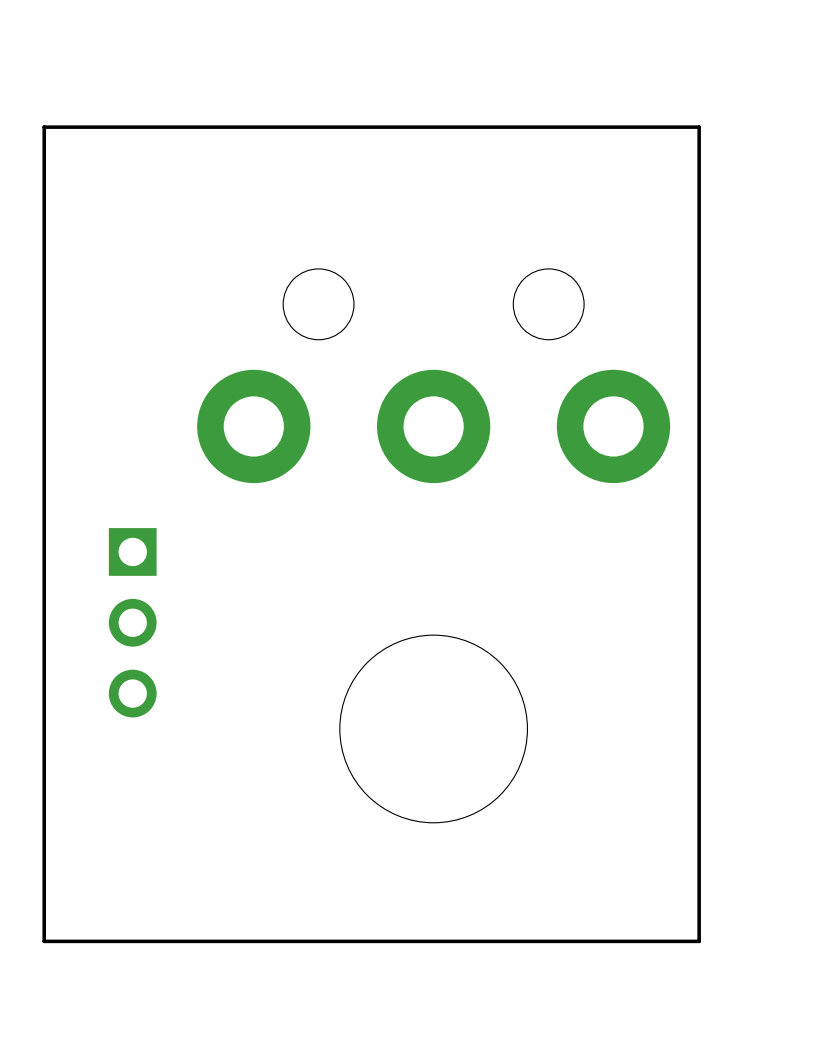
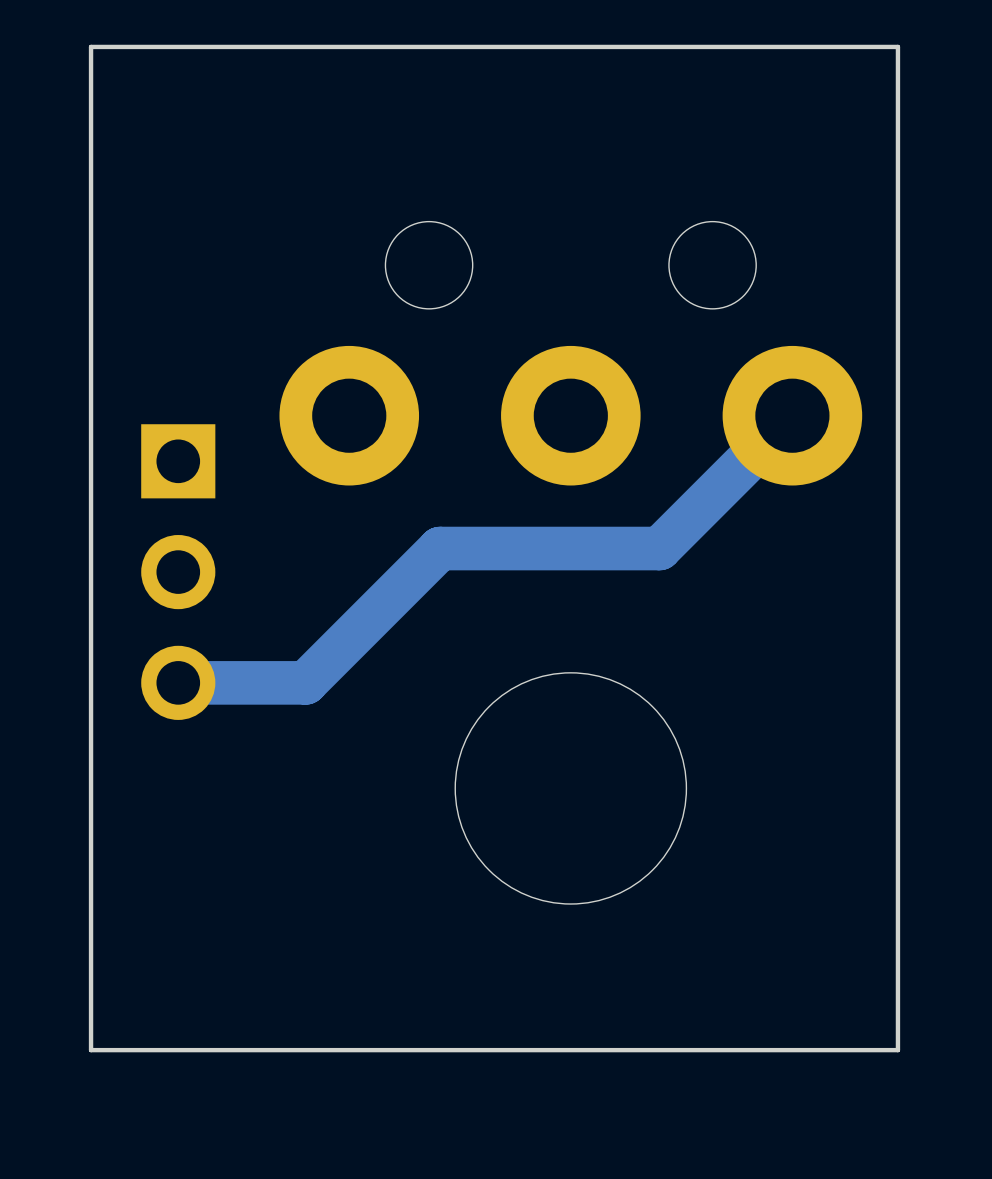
track: none -> (792, 415) (659, 548) (439, 548) (305, 682) (178, 682)
part: none -> (178, 572)
part: (132, 622) -> none

